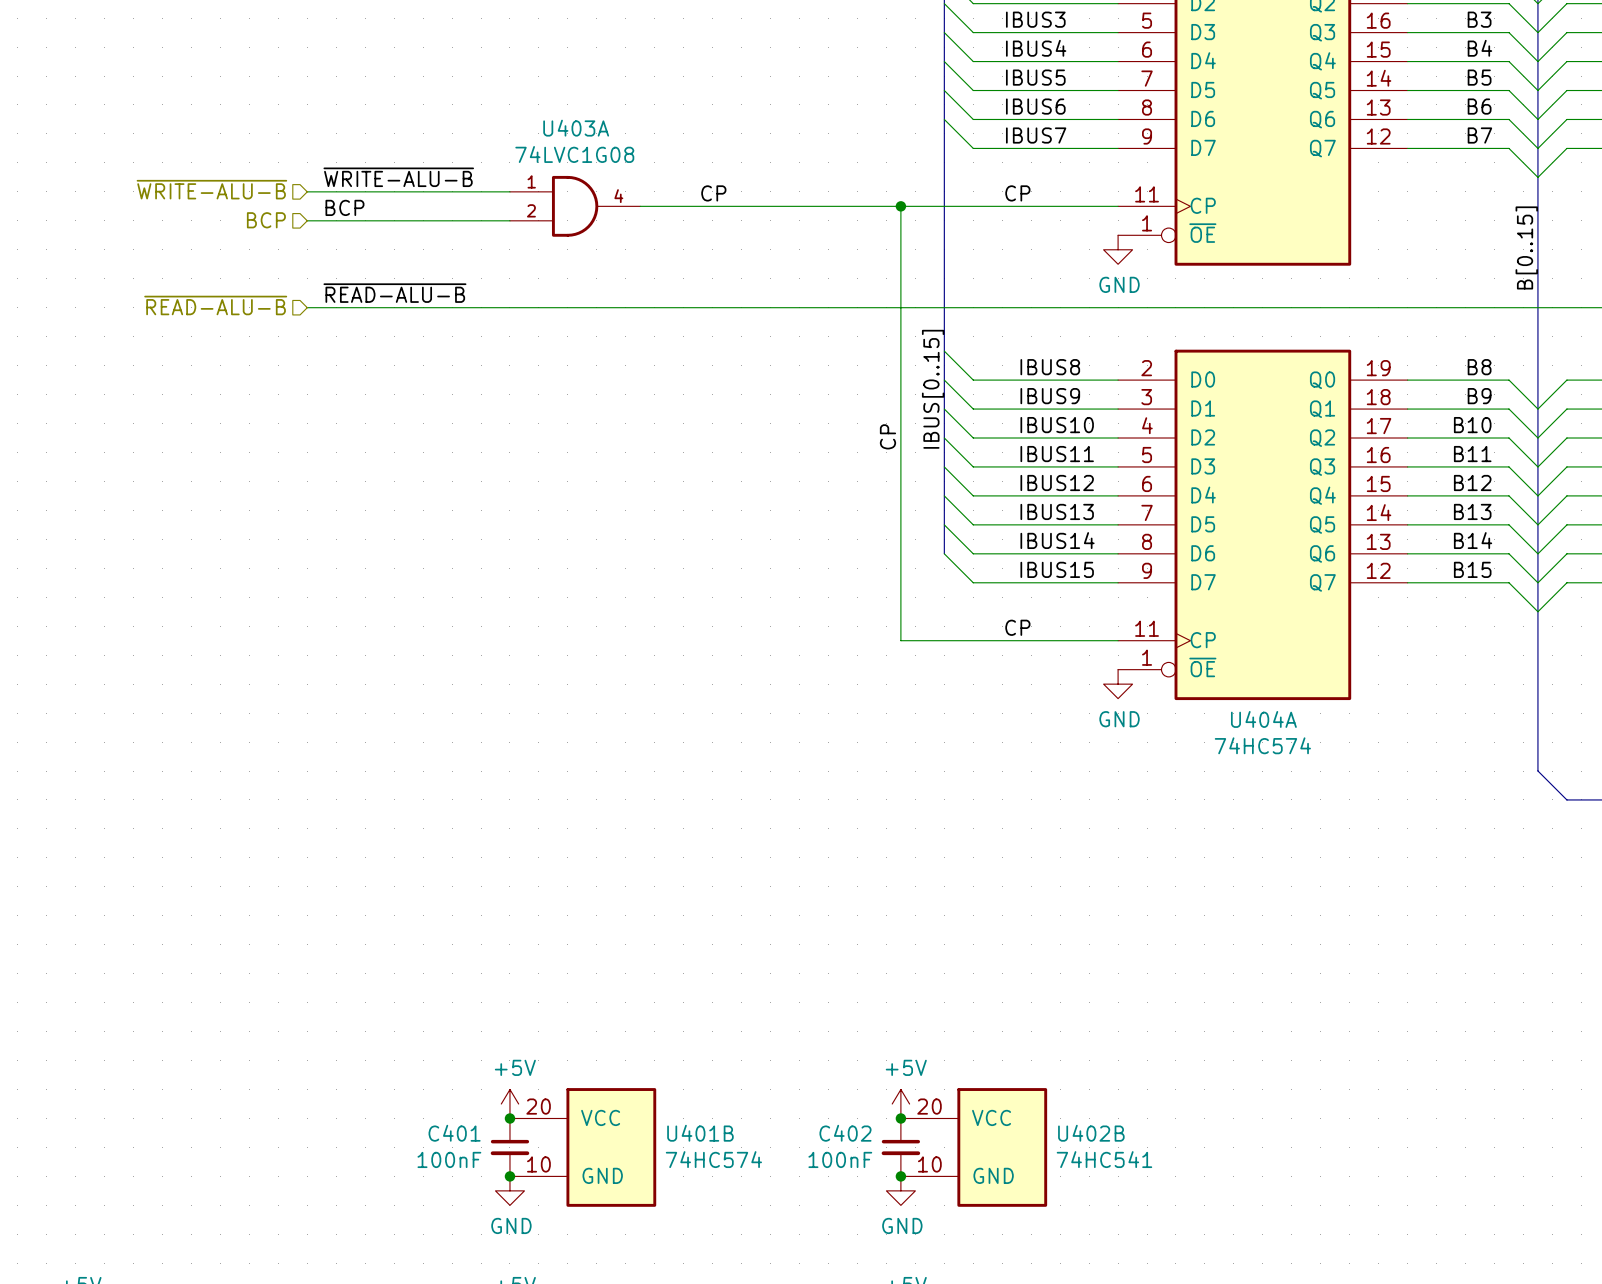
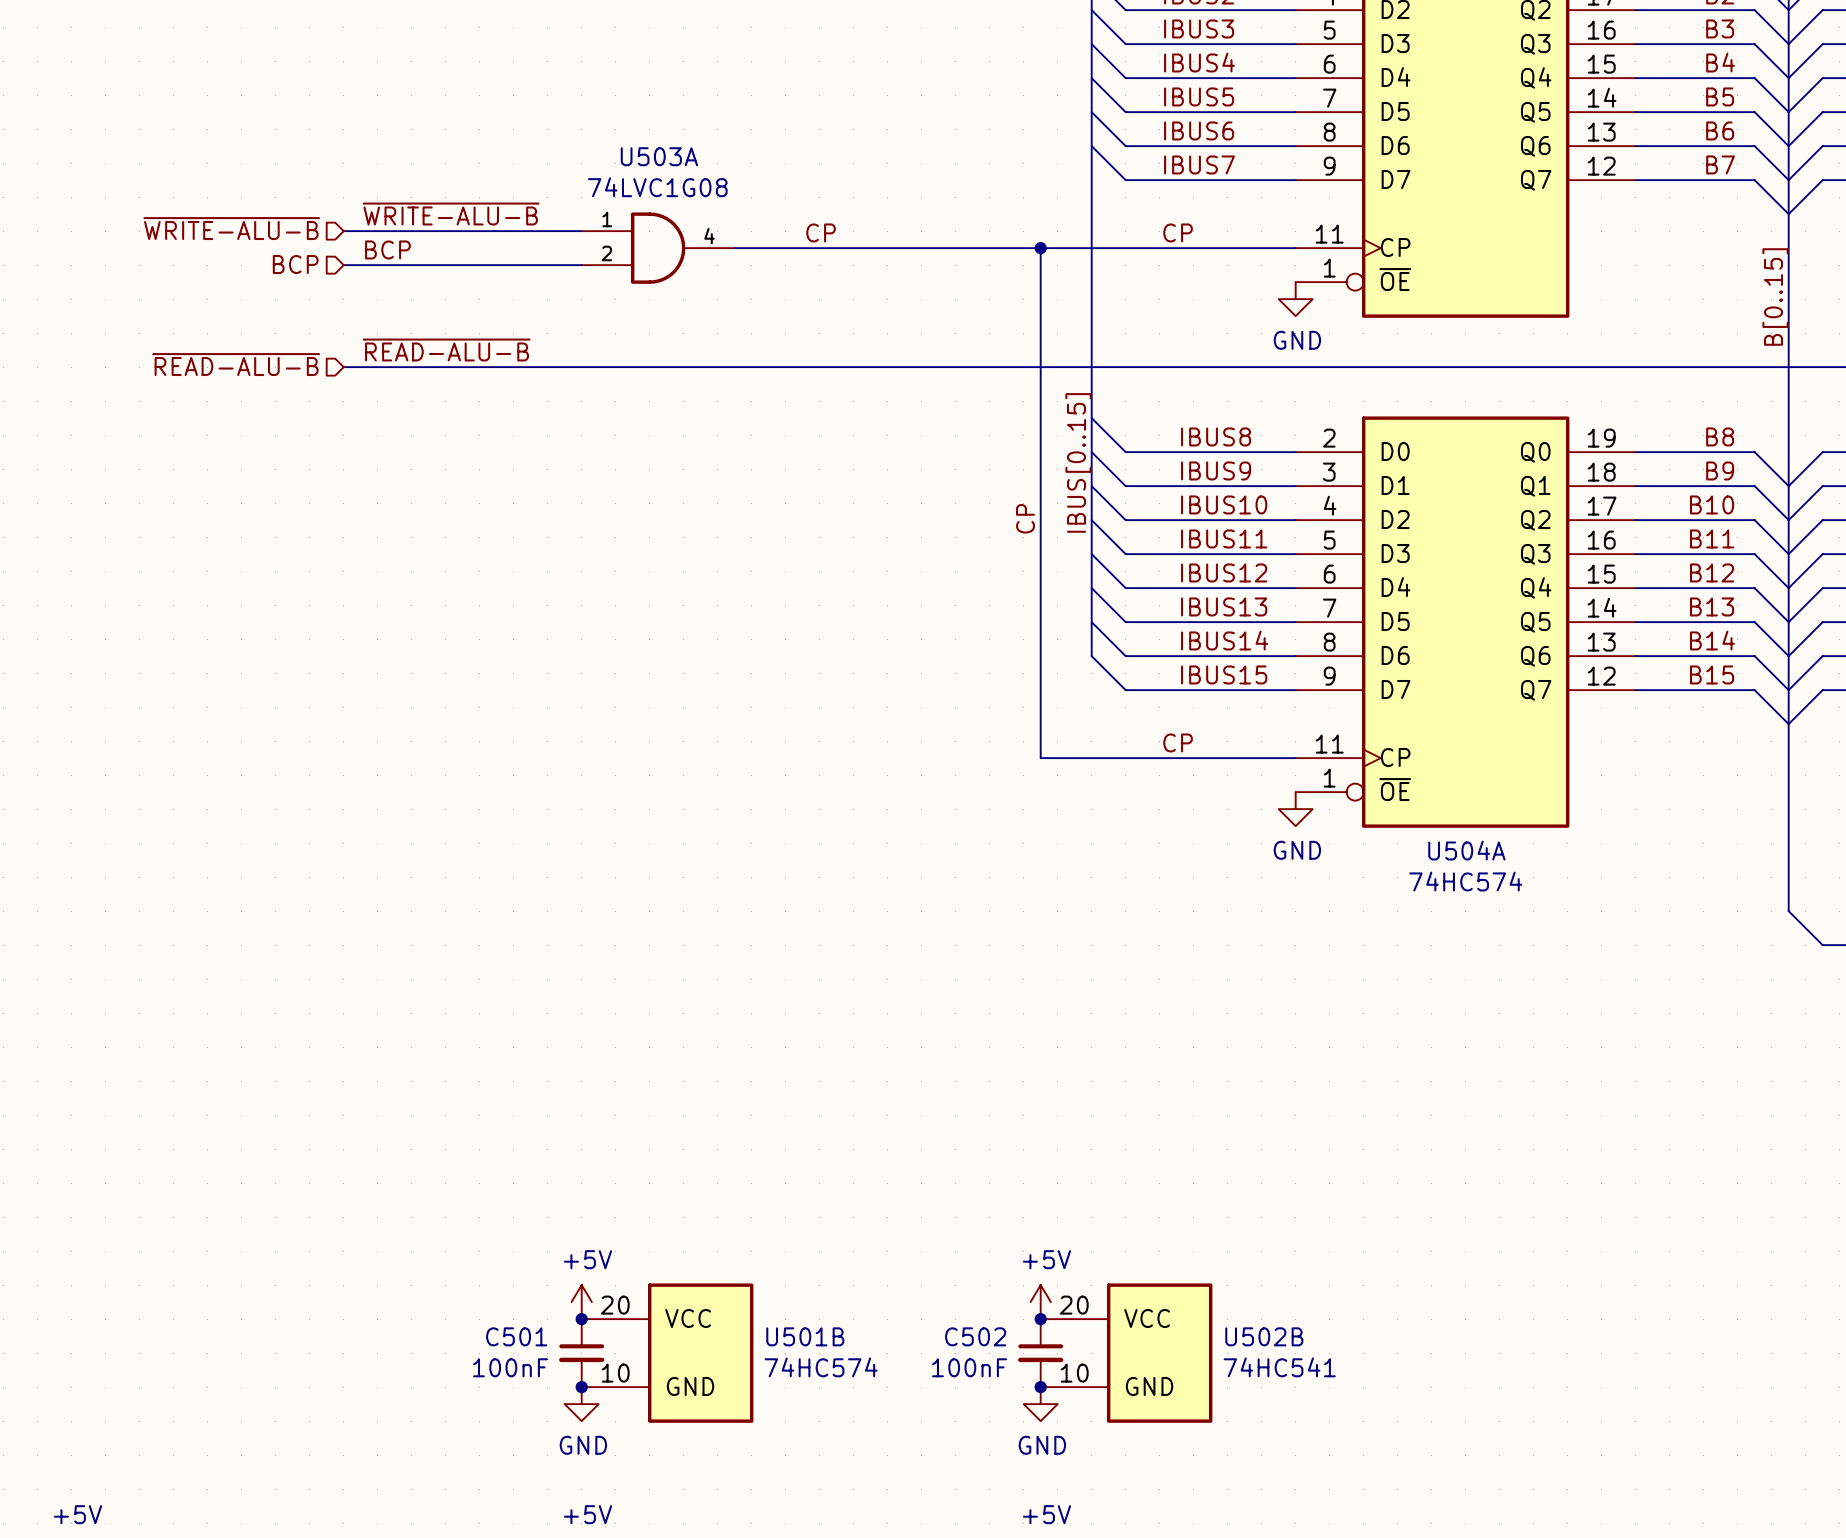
U403A name: U403A (576, 128) -> U503A (659, 156)
U404A name: U404A (1263, 719) -> U504A (1466, 850)
C401 name: C401 (454, 1133) -> C501 (516, 1336)
U401B name: U401B (700, 1133) -> U501B (805, 1336)
C402 name: C402 (845, 1133) -> C502 (975, 1336)
U402B name: U402B (1091, 1133) -> U502B (1264, 1336)

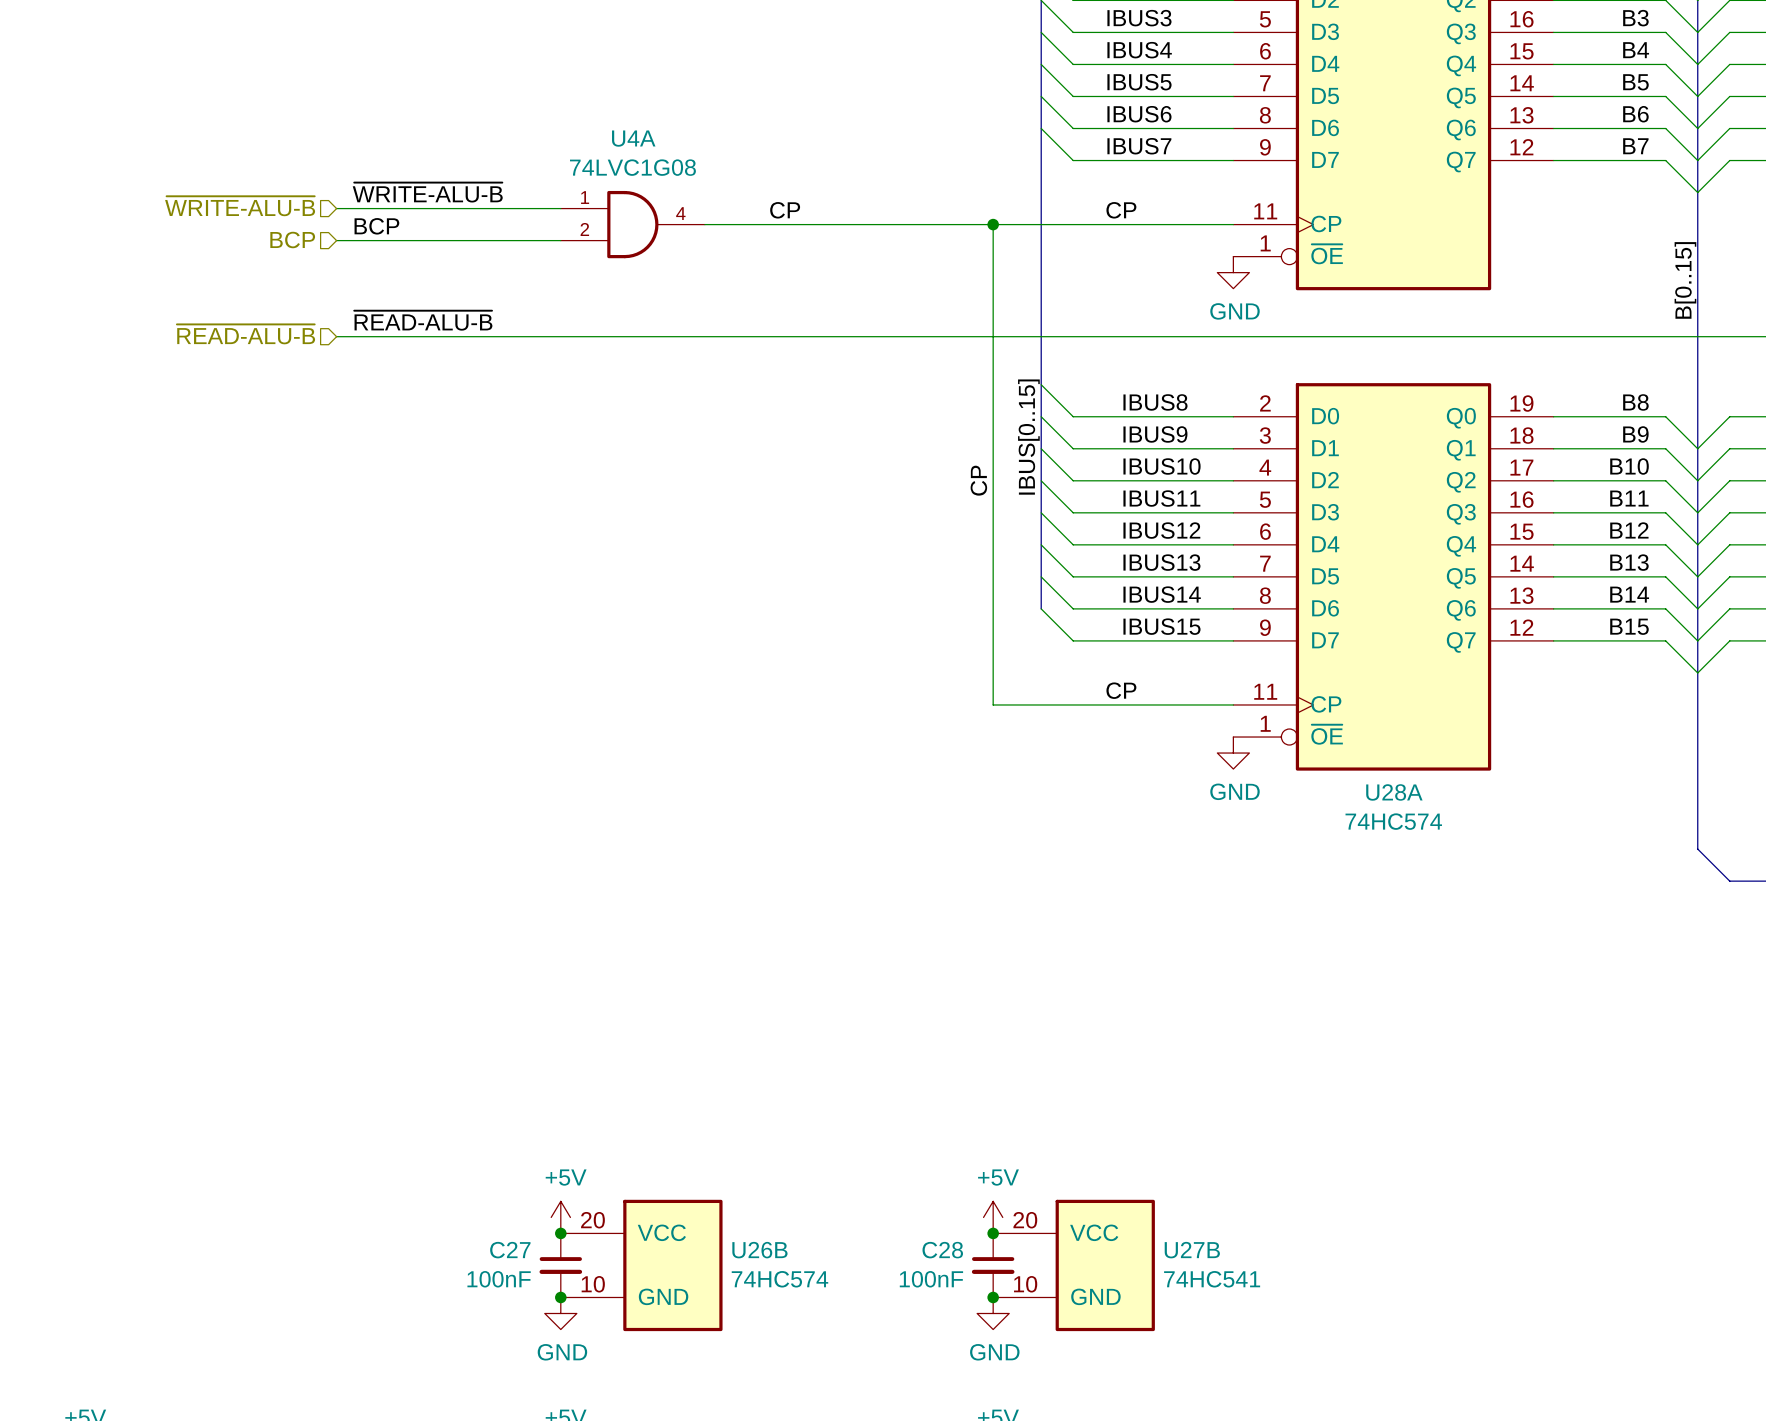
U503A name: U503A (659, 156) -> U4A (633, 138)
U504A name: U504A (1466, 850) -> U28A (1394, 792)
C501 name: C501 (516, 1336) -> C27 (510, 1250)
U501B name: U501B (805, 1336) -> U26B (759, 1250)
C502 name: C502 (975, 1336) -> C28 (942, 1250)
U502B name: U502B (1264, 1336) -> U27B (1192, 1250)

